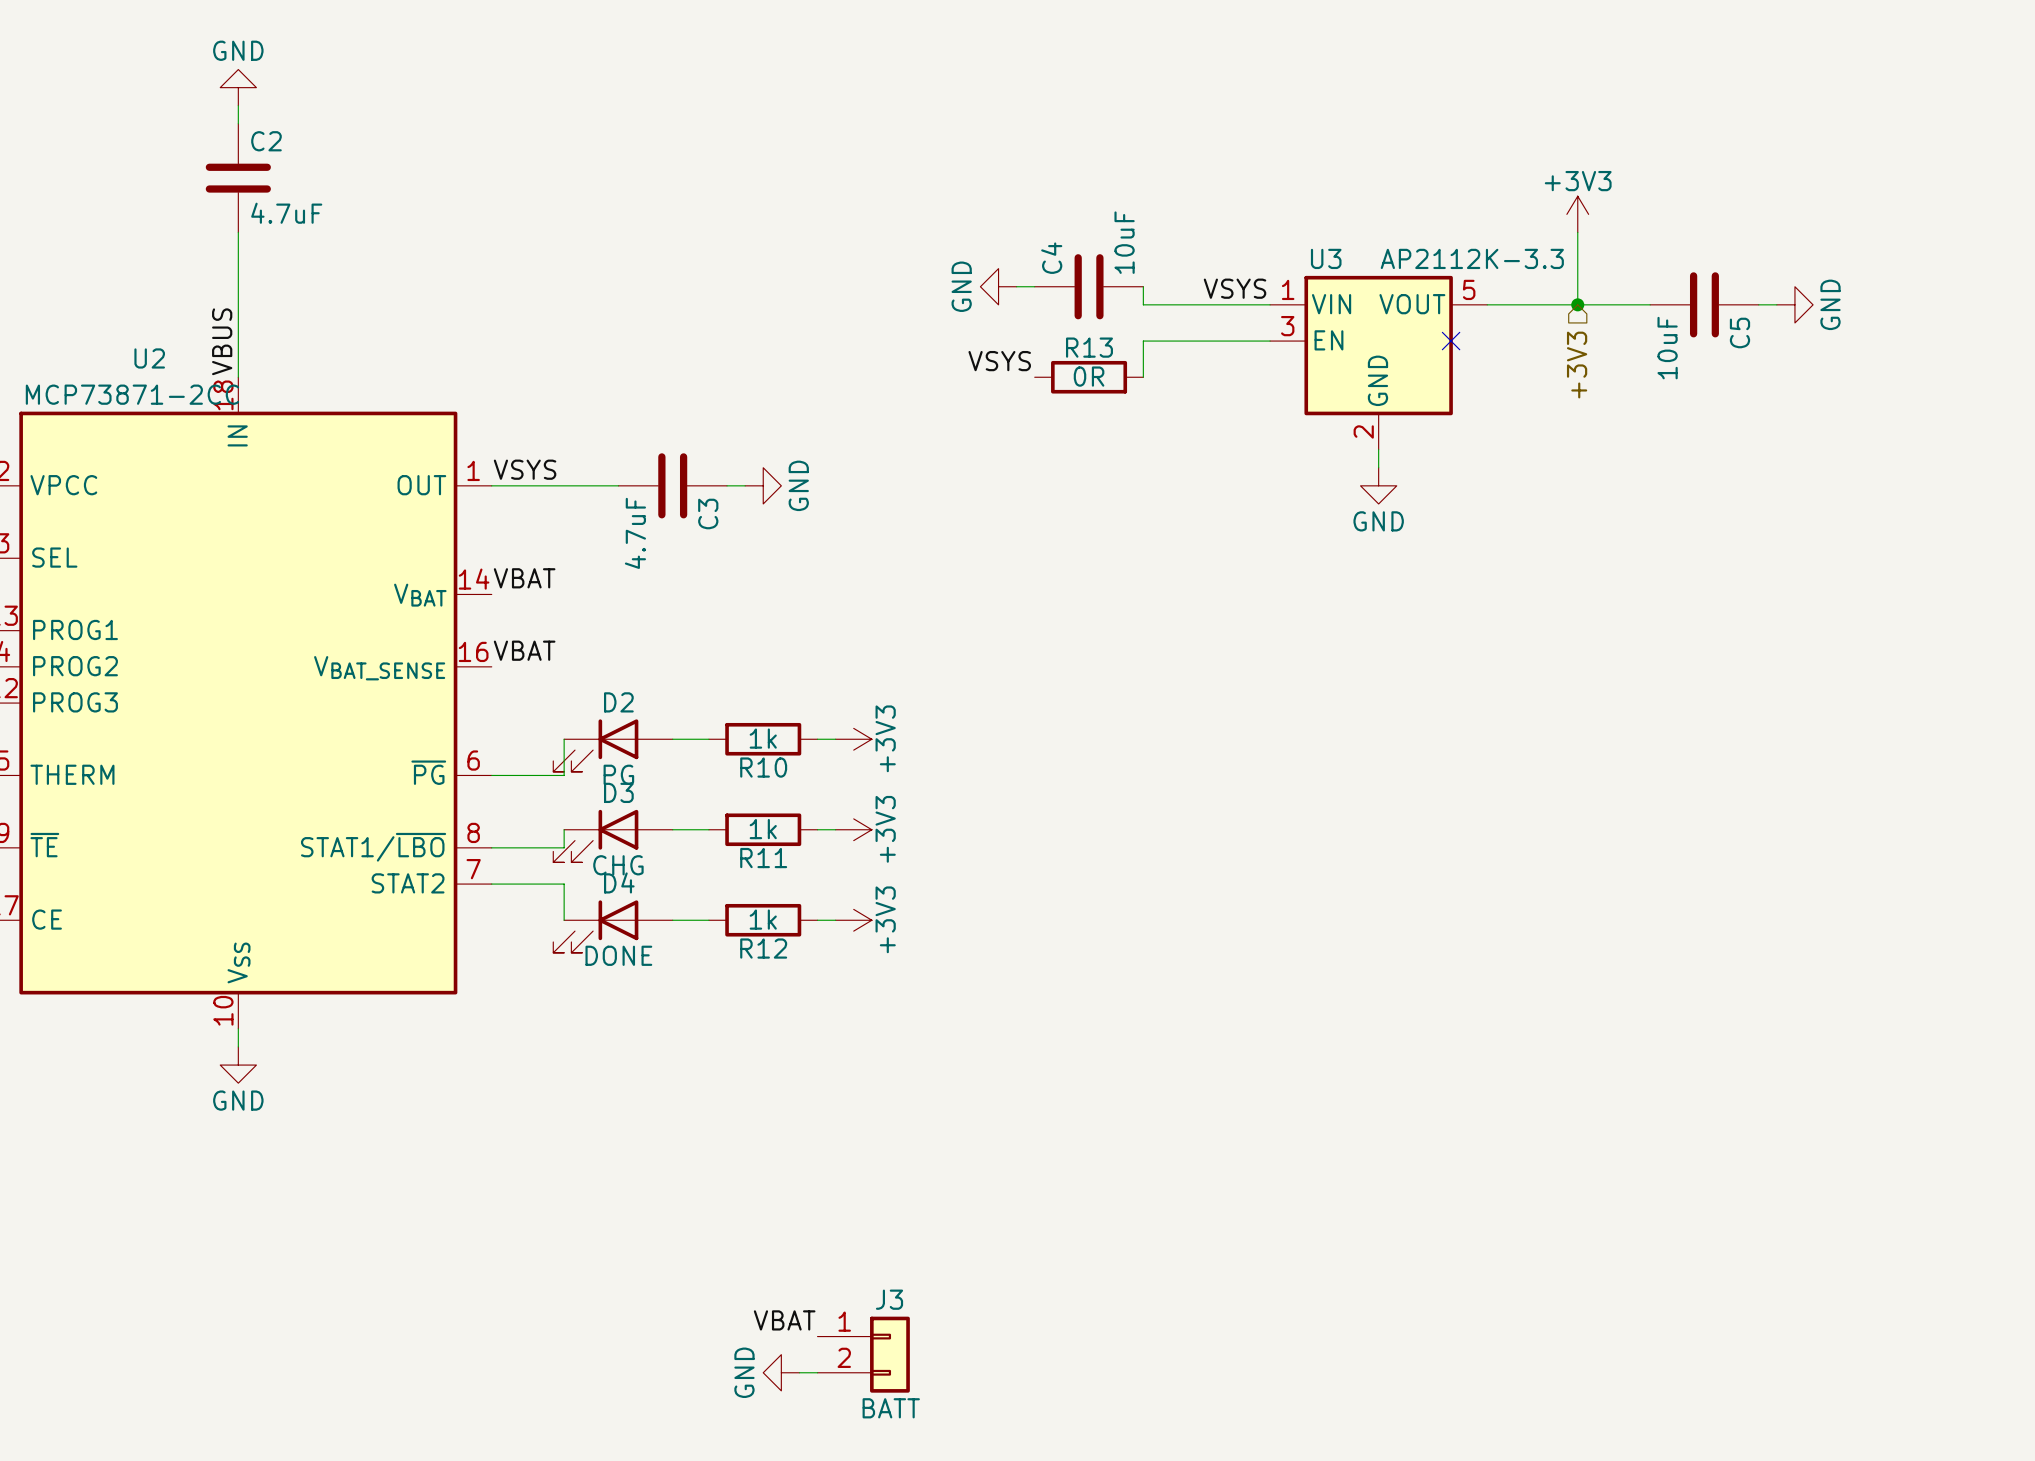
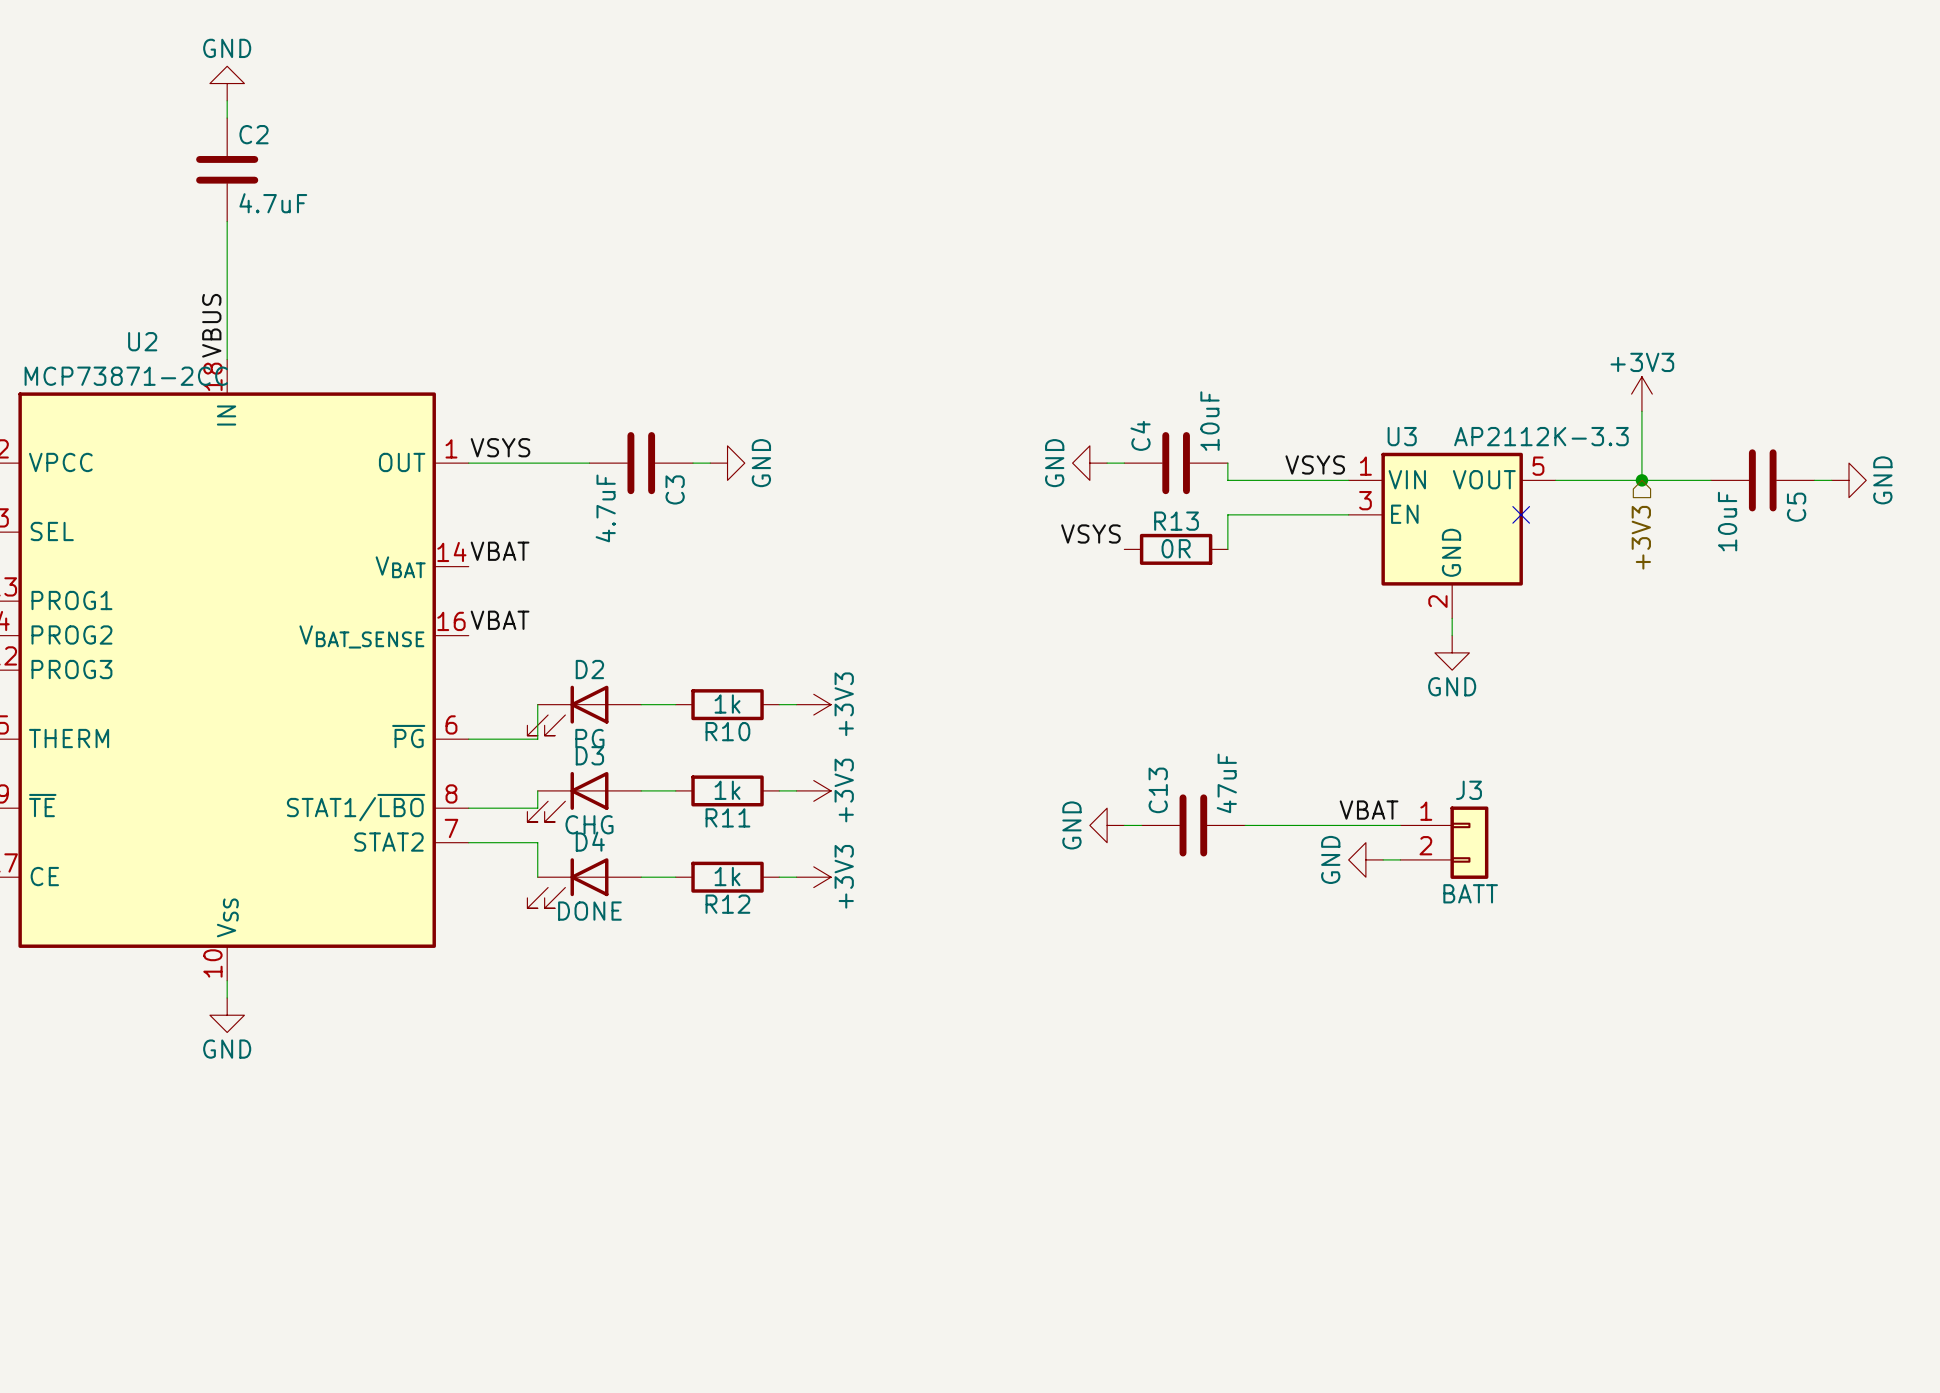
power symbol position: +3V3 (1577, 214) -> +3V3 (1641, 394)
wire: (1577, 232) (1577, 304) -> (1641, 411) (1641, 480)
power symbol: GND (998, 286) -> none
wire: (1016, 286) (1034, 286) -> (1107, 463) (1124, 463)
C4 position: (1089, 286) -> (1176, 463)
wire: (1143, 286) (1143, 304) (1270, 304) -> (1227, 463) (1227, 480) (1348, 480)
label: VSYS (1235, 288) -> none
wire: (1487, 304) (1650, 304) -> (1555, 480) (1710, 480)
junction: (1577, 304) -> none
C5 position: (1704, 304) -> (1762, 480)
wire: (1758, 304) (1776, 304) -> (1814, 480) (1831, 480)
power symbol: GND (1794, 304) -> none
wire: (1270, 341) (1143, 341) (1143, 377) -> (1348, 514) (1227, 514) (1227, 549)
no-connect mark: (1451, 341) -> none
label: VSYS (999, 361) -> none
U3 position: (1378, 362) -> (1452, 535)
hierarchical label position: +3V3 (1577, 365) -> +3V3 (1641, 537)
R13 position: (1089, 377) -> (1176, 549)
wire: (1378, 449) (1378, 467) -> (1452, 618) (1452, 635)
power symbol: none -> GND (1089, 463)
power symbol: GND (1378, 485) -> none
label: none -> VSYS (1315, 464)
junction: none -> (1641, 480)
power symbol: none -> GND (1848, 480)
no-connect mark: none -> (1521, 514)
label: none -> VSYS (1090, 533)
power symbol: none -> GND (1452, 652)
label: none -> VBAT (1369, 810)
power symbol: none -> GND (1107, 825)
wire: none -> (1124, 825) (1141, 825)
C13: none -> 47uF (1193, 825)
wire: none -> (1245, 825) (1400, 825)
power symbol: none -> GND (1365, 859)
wire: none -> (1383, 859) (1400, 859)
label: VBAT (784, 1320) -> none
J3 position: (863, 1354) -> (1444, 842)
power symbol: GND (781, 1372) -> none
wire: (799, 1372) (817, 1372) -> none

